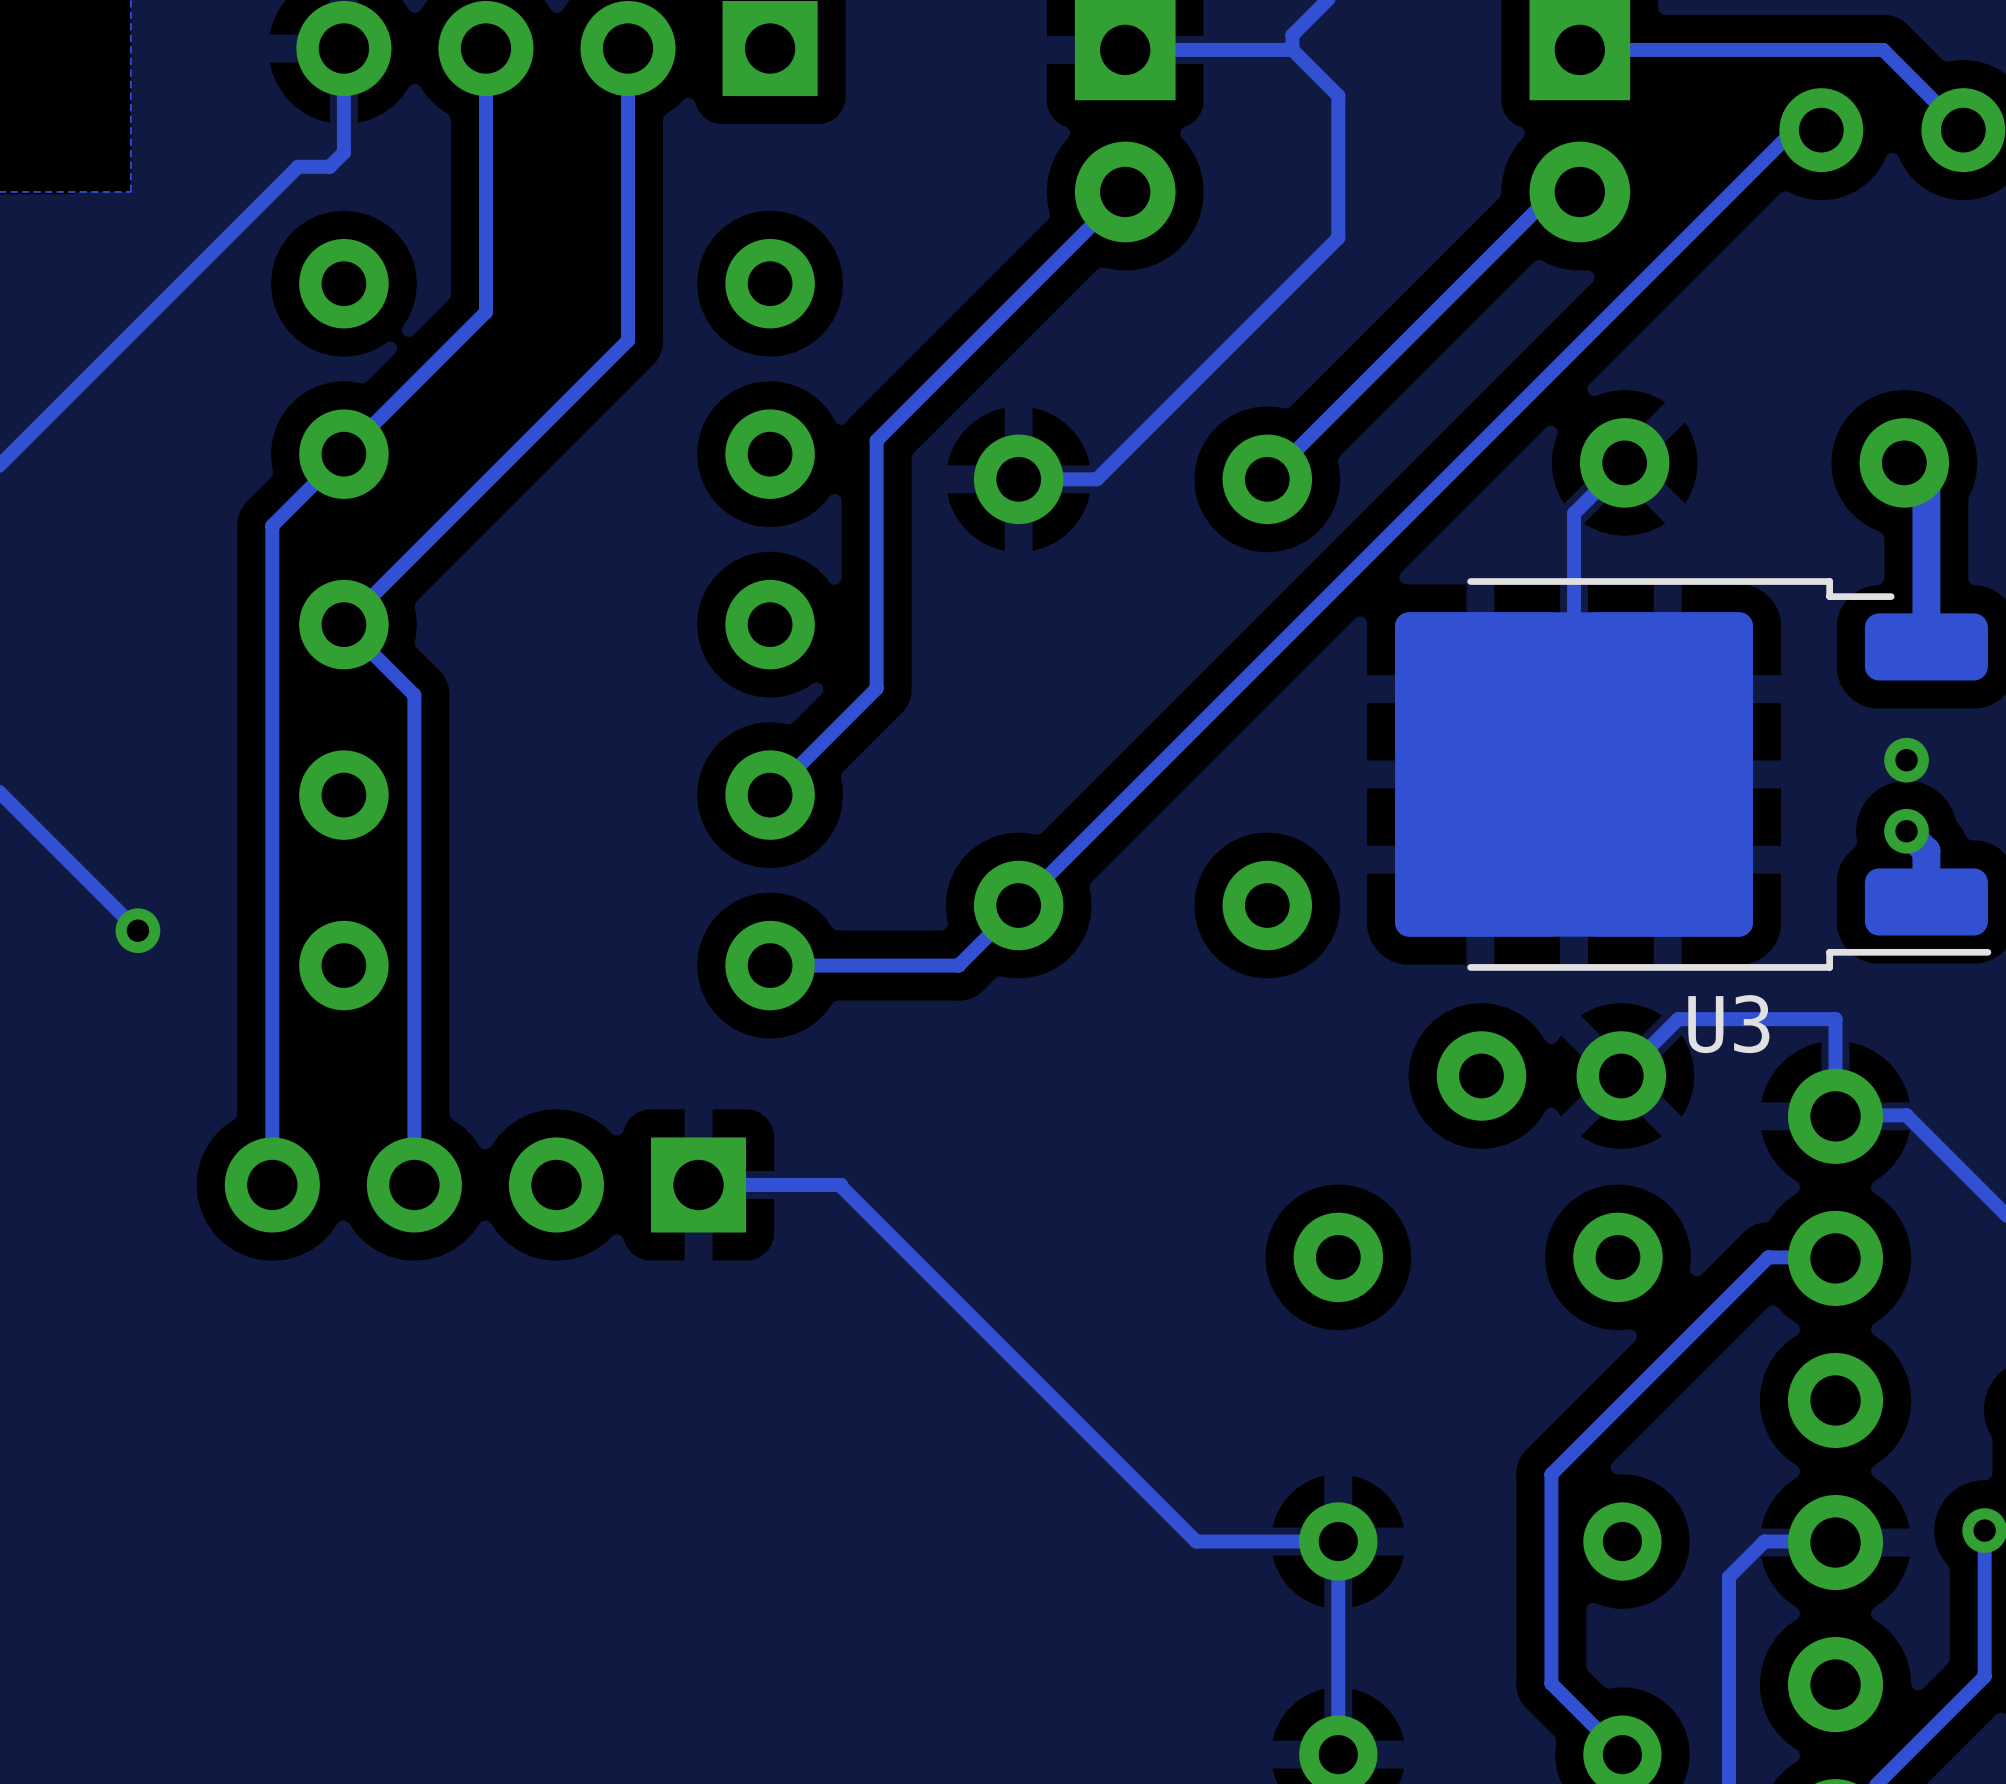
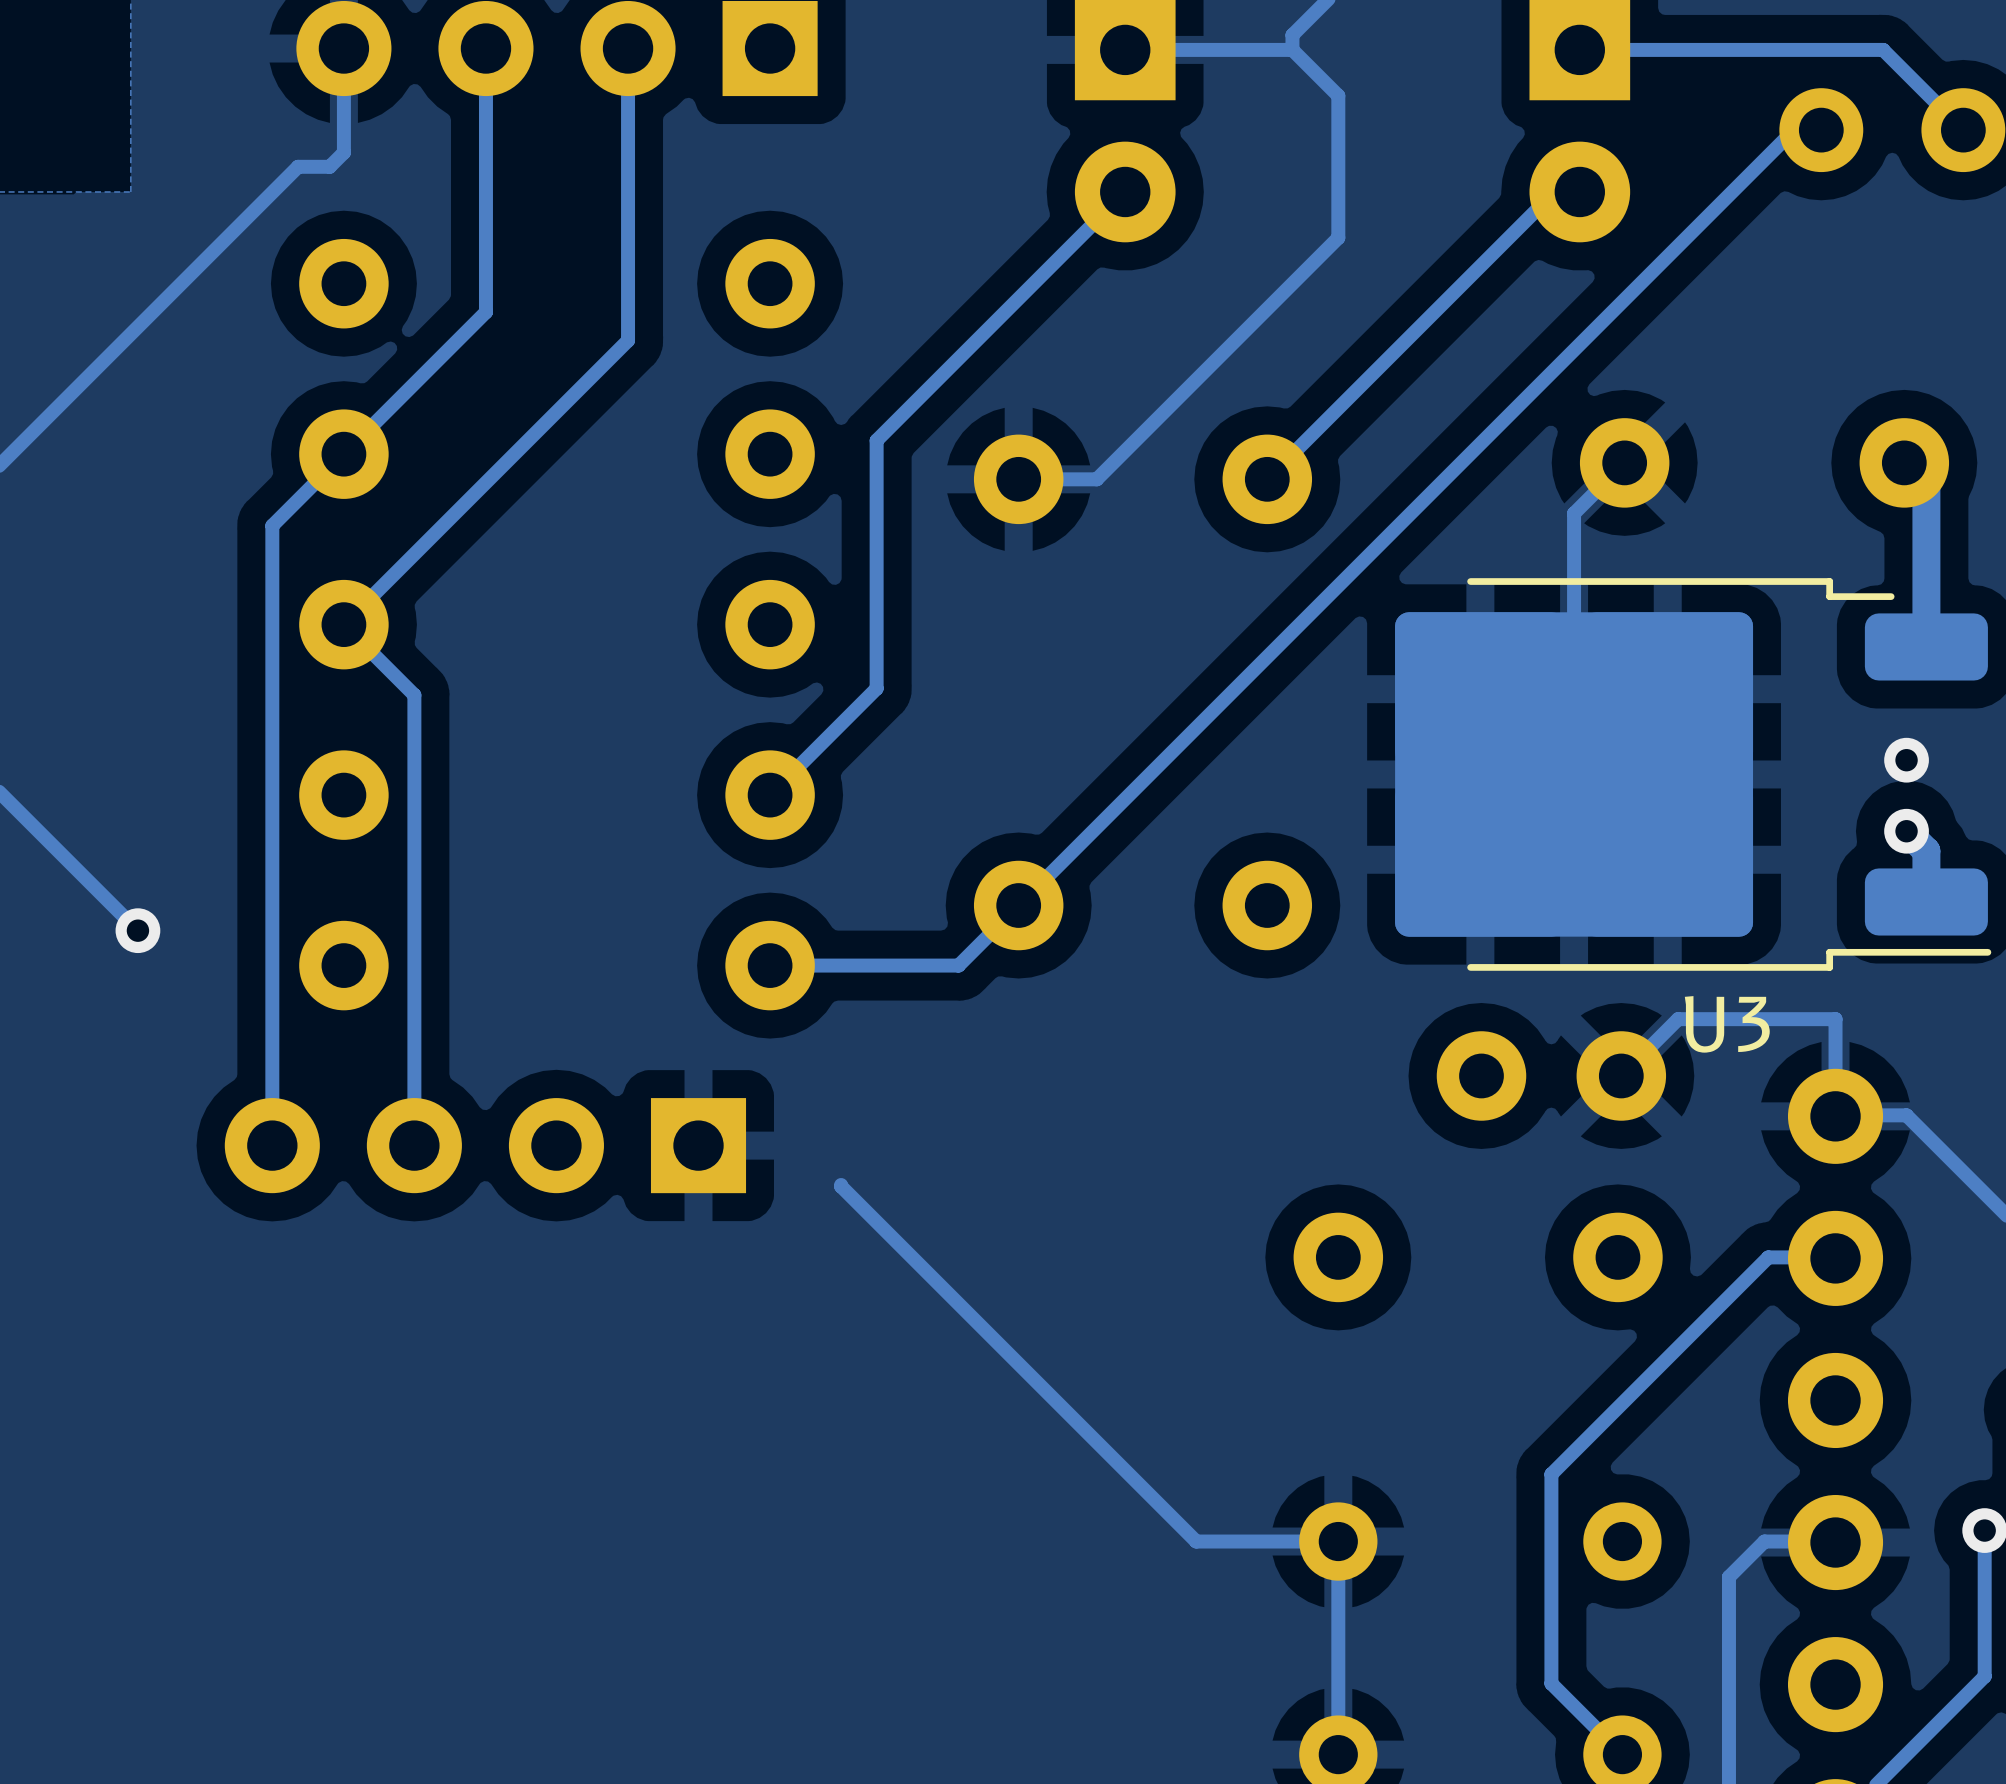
part position: (485, 1184) -> (485, 1145)
track: (841, 1184) (698, 1184) -> none

